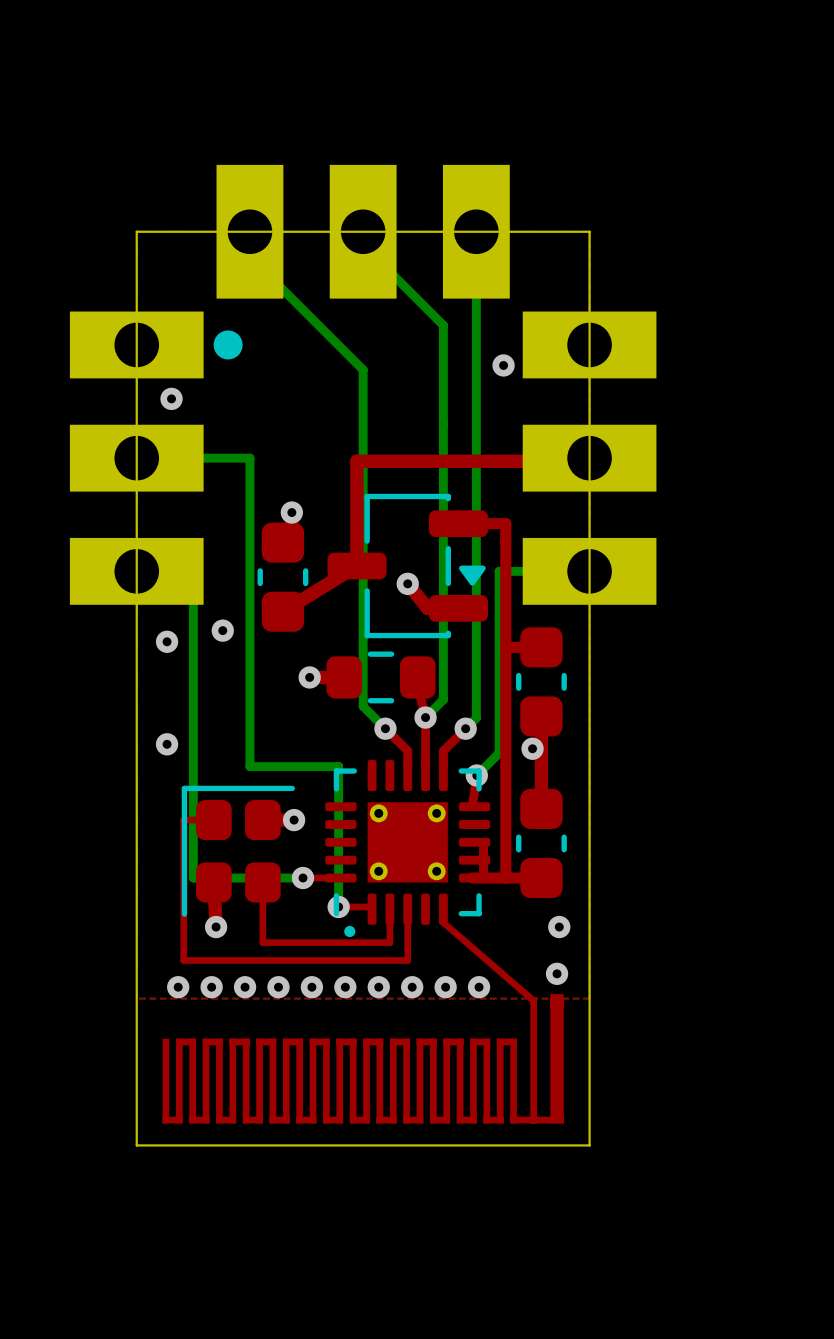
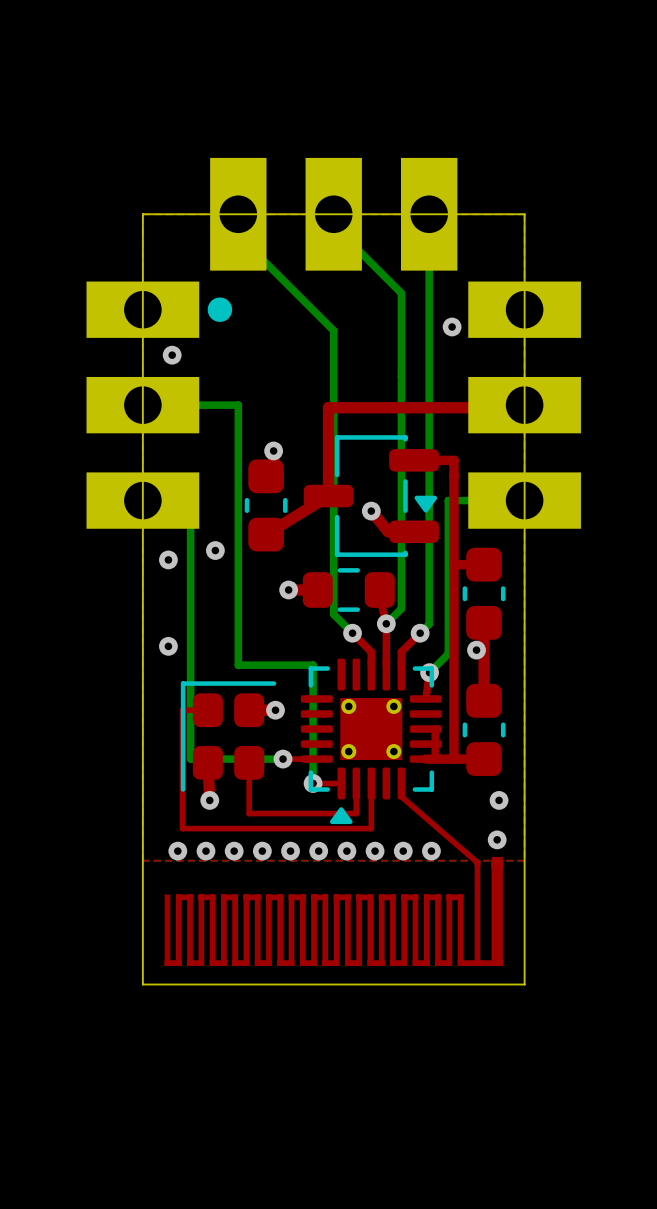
part footprint: [325, 759, 491, 938] -> [300, 658, 442, 825]

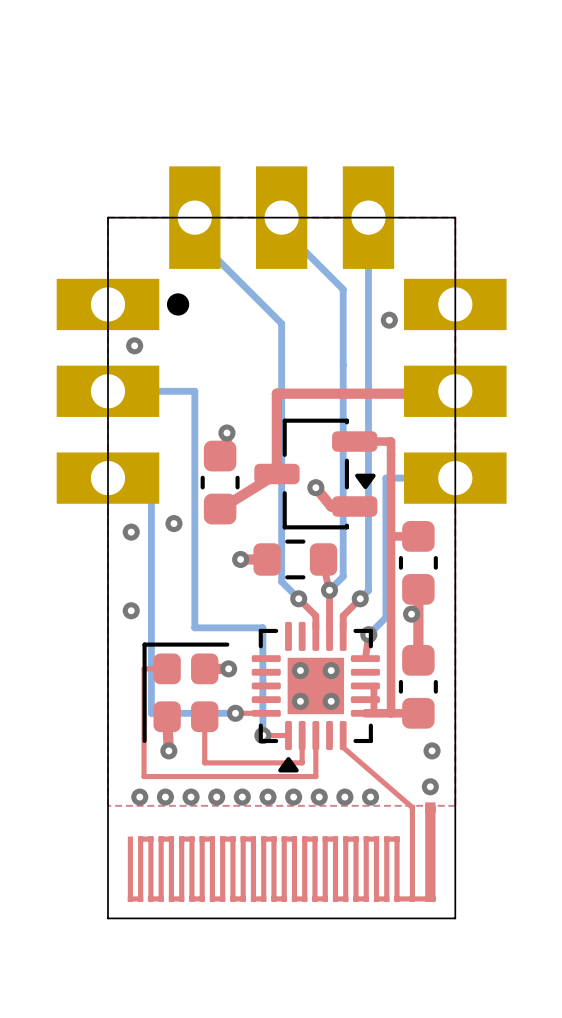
part footprint: [300, 658, 442, 825] -> [251, 621, 380, 773]
via: none -> (300, 670)
via: none -> (331, 670)
via: none -> (300, 701)
via: none -> (331, 701)

